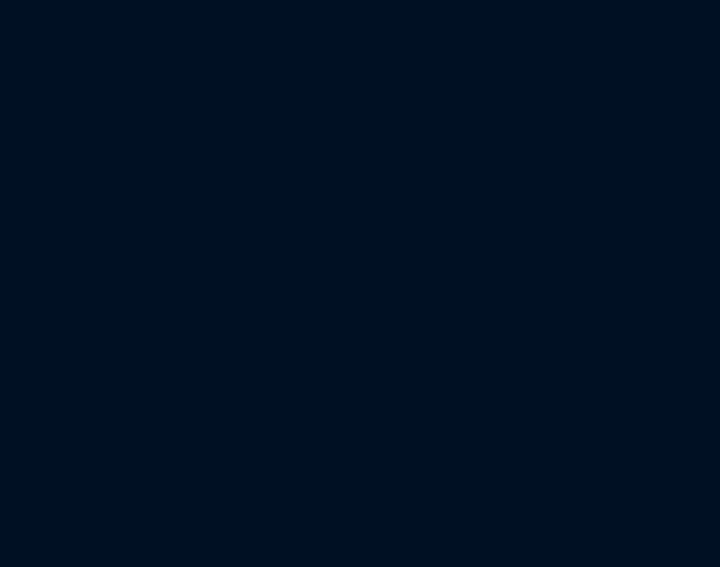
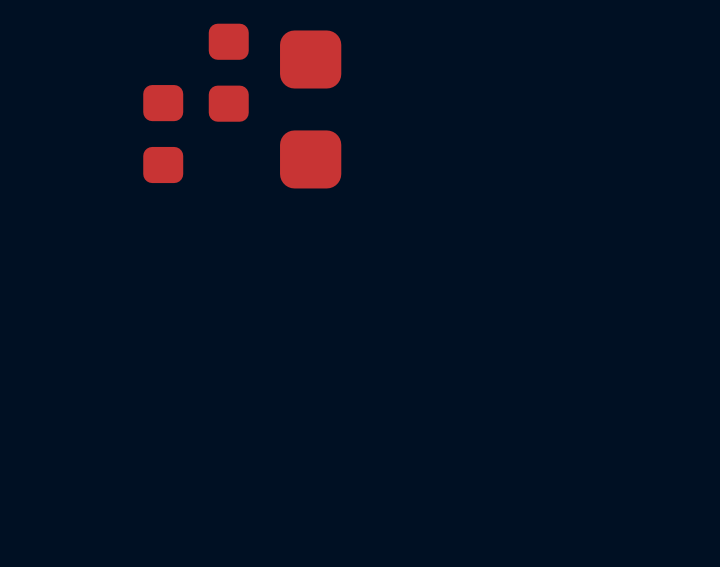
part: none -> (228, 72)
part: none -> (310, 109)
part: none -> (163, 134)

